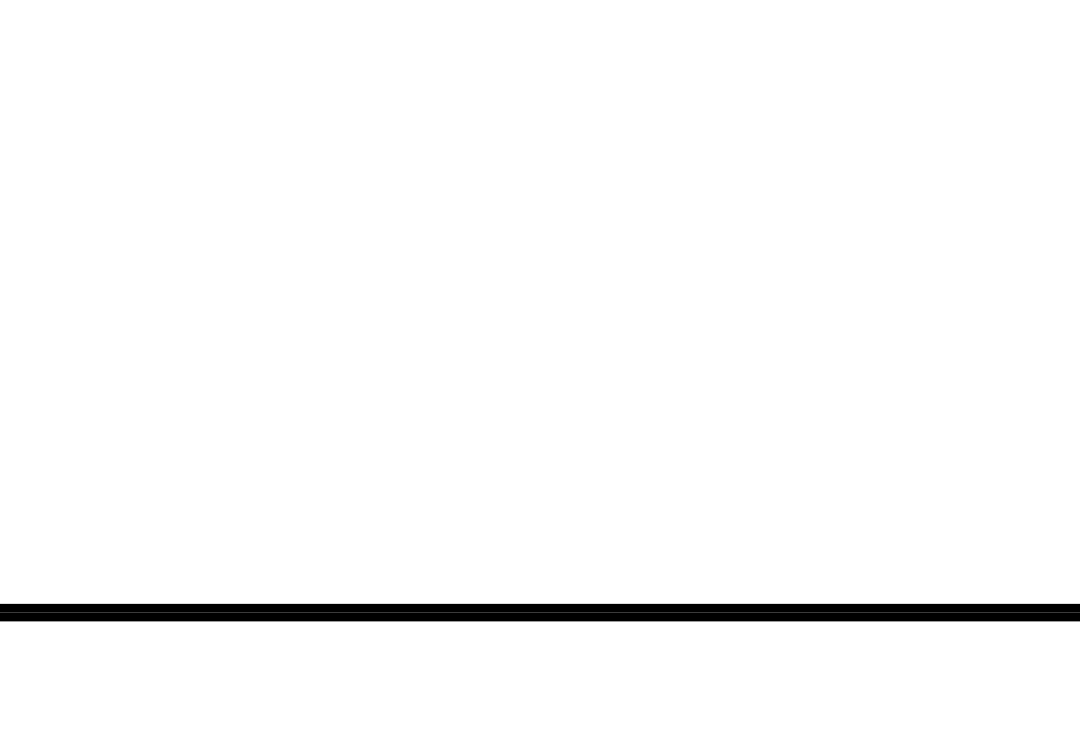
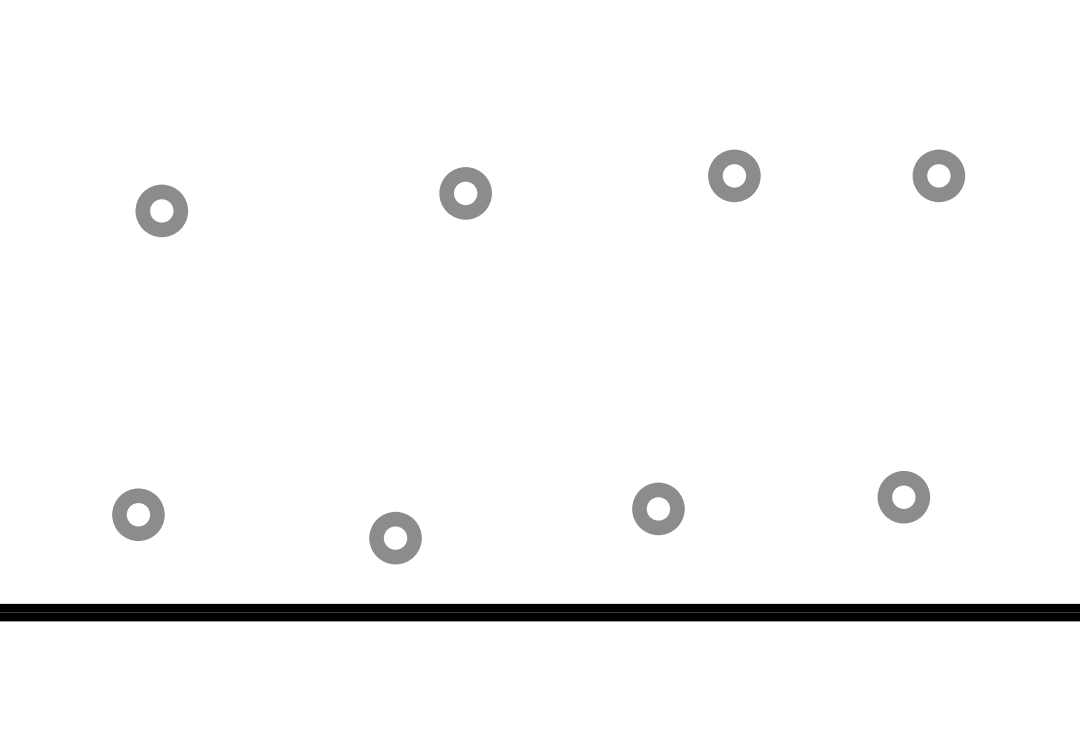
via: none -> (734, 175)
via: none -> (938, 175)
via: none -> (465, 193)
via: none -> (161, 210)
via: none -> (903, 497)
via: none -> (658, 508)
via: none -> (138, 514)
via: none -> (395, 538)

